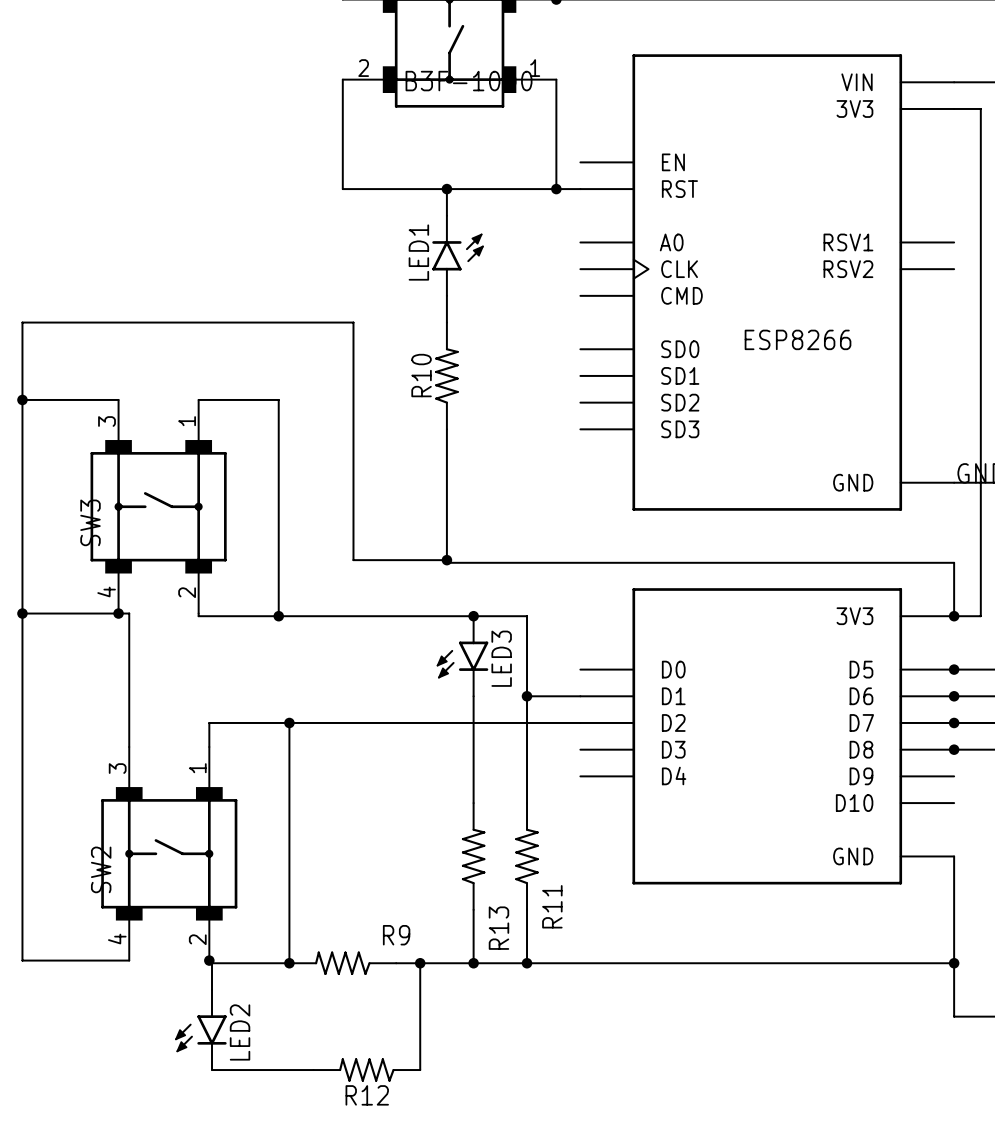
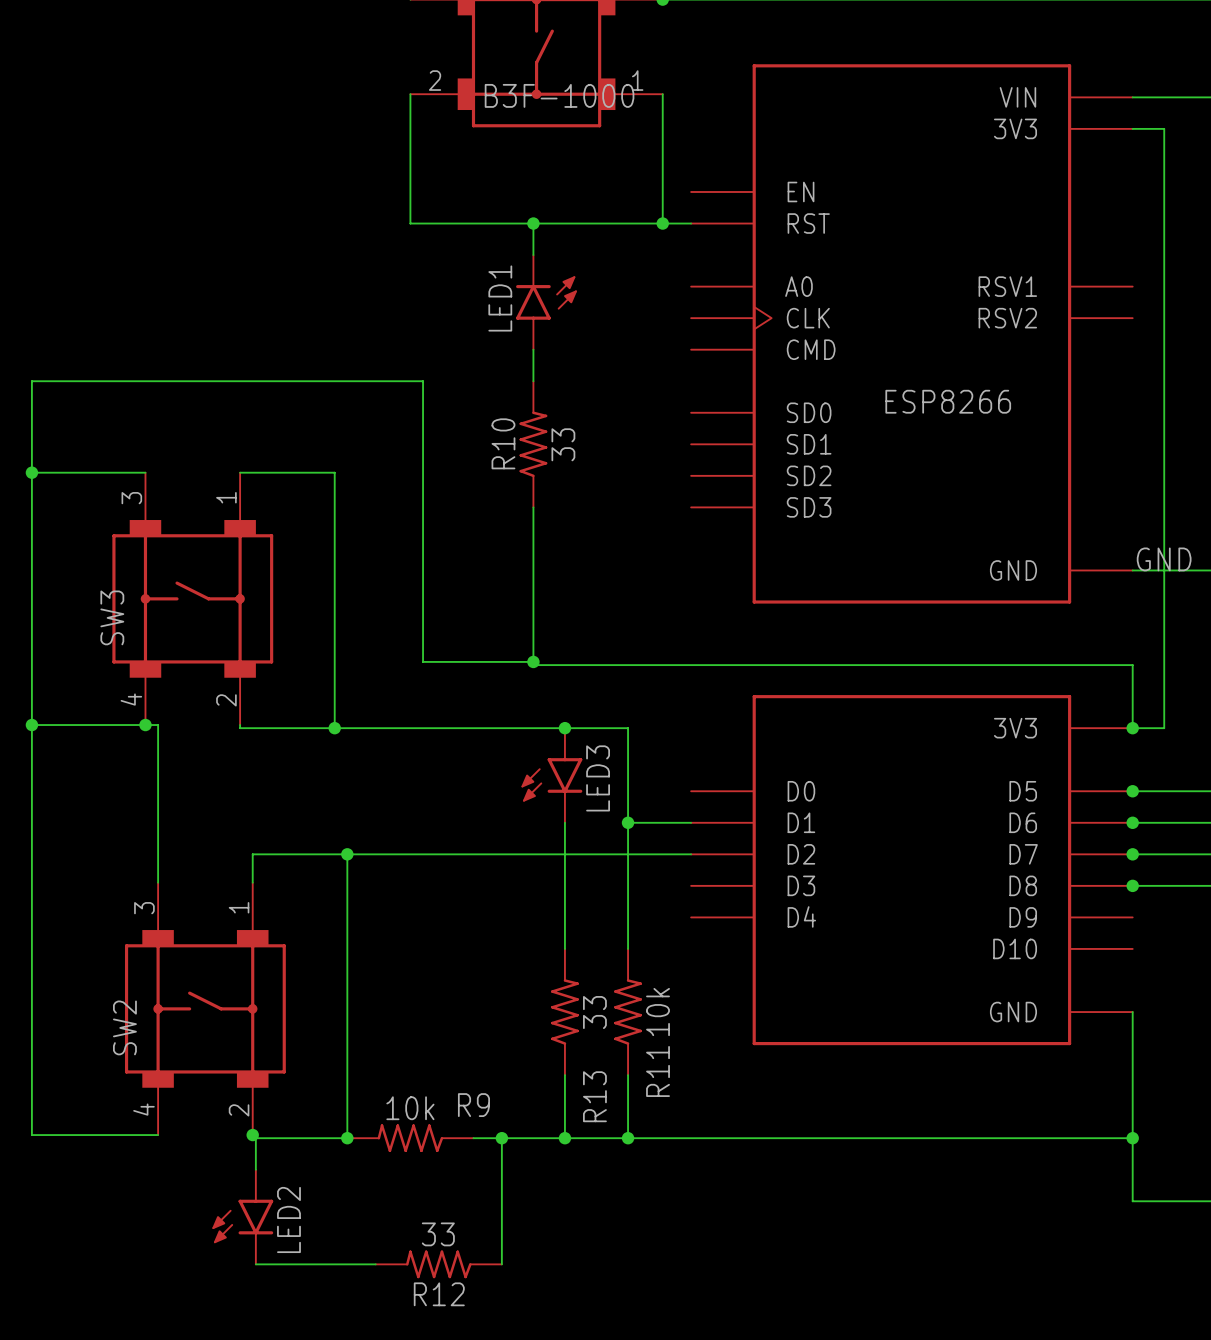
R10 value: none -> 33 (563, 444)
R13 value: none -> 33 (594, 1012)
R11 value: none -> 10k (658, 1012)
R9 value: none -> 10k (410, 1108)
R12 value: none -> 33 (438, 1234)

